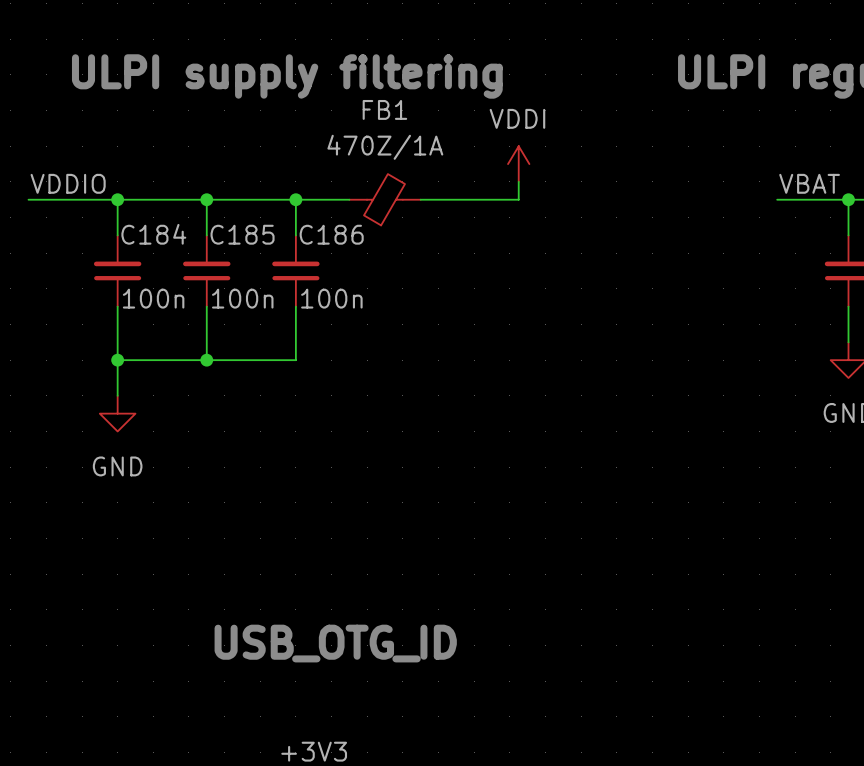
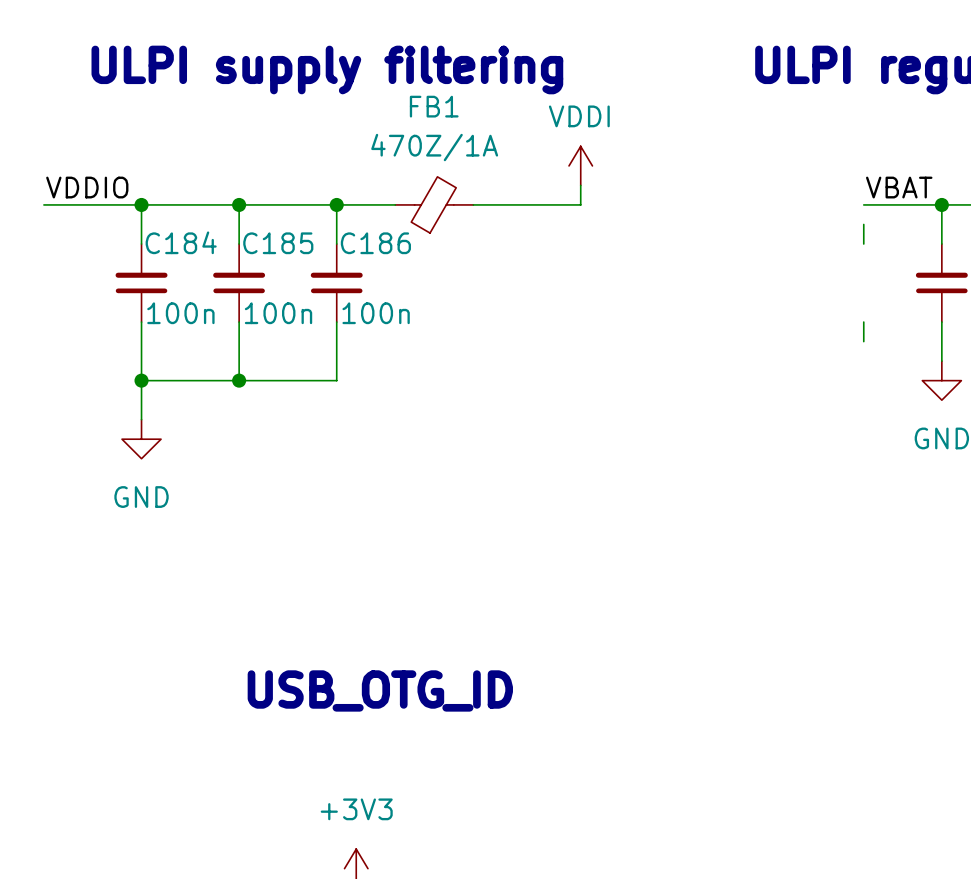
wire: none -> (863, 224) (863, 244)
wire: none -> (863, 322) (863, 341)

